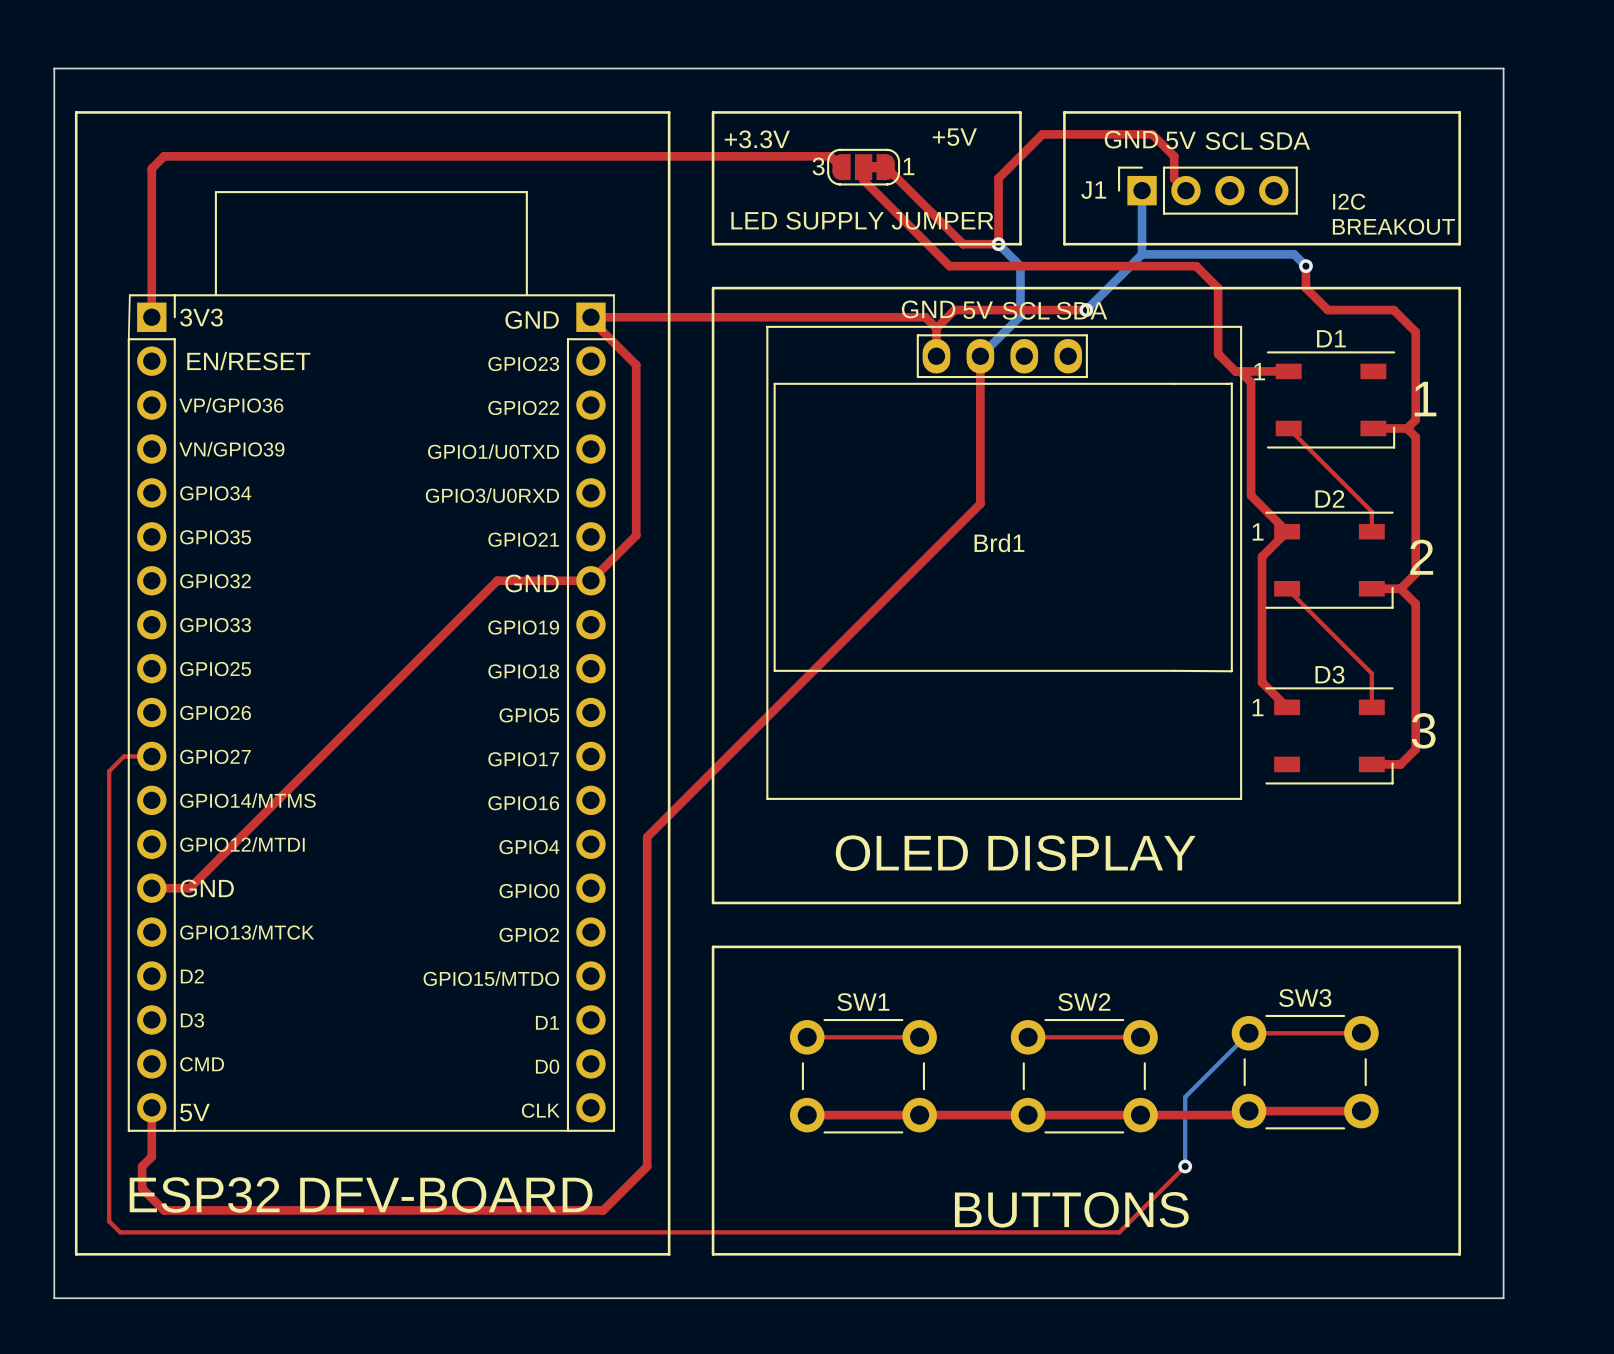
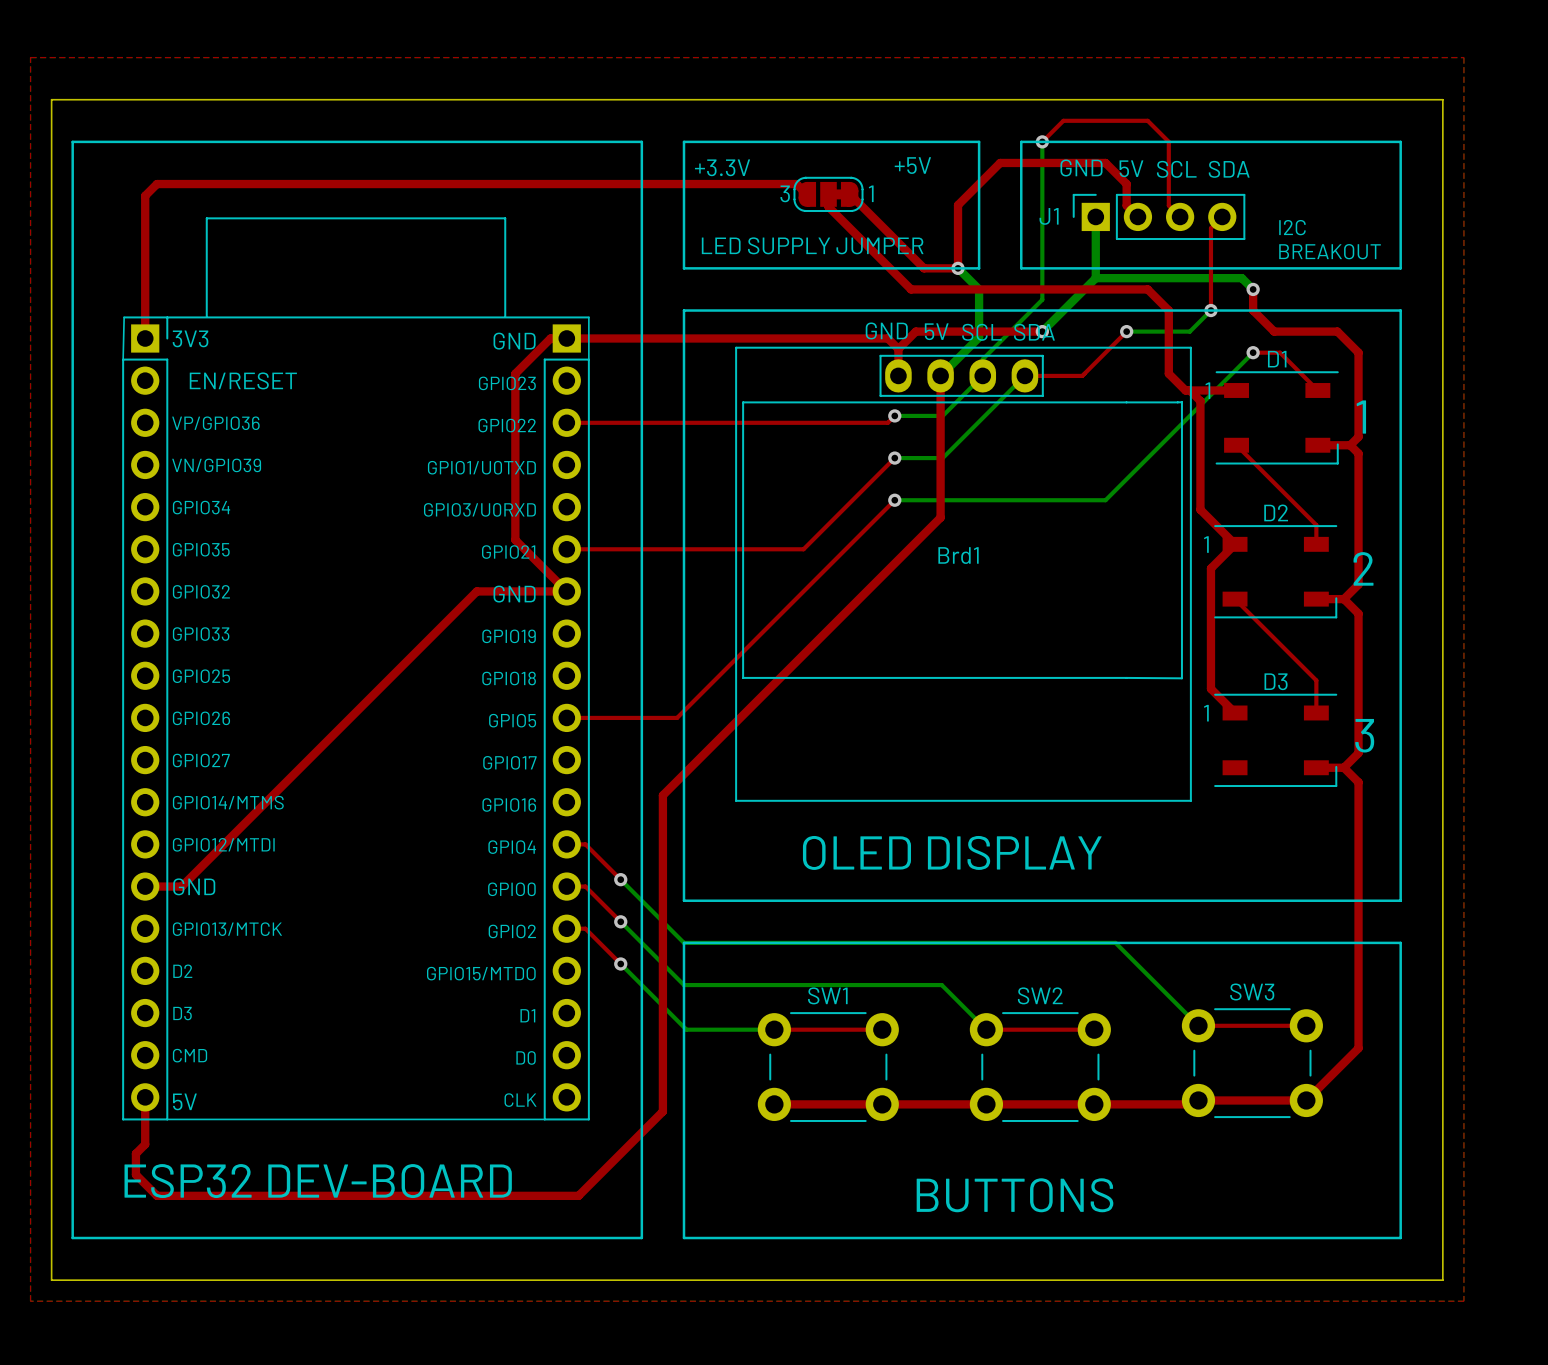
top zone outline: none -> (30, 57) (1463, 57) (1463, 1301) (30, 1301) (30, 57)
top track: none -> (1042, 141) (1063, 120) (1147, 120) (1168, 141) (1168, 205) (1180, 216)
bottom track: none -> (1042, 141) (1042, 299) (982, 359) (982, 375) (942, 415) (894, 415)
via: none -> (1042, 141)
top track: none -> (1222, 216) (1210, 228) (1210, 310)
bottom track: none -> (1210, 310) (1189, 331) (1126, 331)
via: none -> (1210, 310)
top track: none -> (1126, 331) (1082, 375) (1024, 375)
via: none -> (1126, 331)
top track: (590, 319) (636, 364) (636, 535) (590, 580) -> (566, 338) (550, 338) (515, 373) (515, 540) (566, 591)
top track: none -> (1253, 352) (1280, 352) (1317, 390)
bottom track: none -> (1253, 352) (1105, 500) (894, 500)
via: none -> (1253, 352)
bottom track: none -> (1024, 375) (942, 458) (894, 458)
top track: none -> (894, 415) (887, 422) (566, 422)
via: none -> (894, 415)
top track: none -> (894, 458) (803, 549) (566, 549)
via: none -> (894, 458)
top track: none -> (894, 500) (677, 717) (566, 717)
via: none -> (894, 500)
top track: (151, 756) (123, 756) (109, 771) (109, 1221) (120, 1232) (1119, 1232) (1185, 1166) -> none
top track: none -> (1343, 767) (1358, 782) (1358, 1048) (1306, 1100)
top track: (691, 793) (647, 837) (647, 1166) -> (662, 795) (662, 1111) (620, 1153)
top track: none -> (566, 844) (585, 844) (620, 879)
via: none -> (620, 879)
top track: none -> (566, 886) (585, 886) (620, 921)
bottom track: none -> (620, 921) (683, 985) (941, 985) (986, 1029)
via: none -> (620, 921)
top track: none -> (566, 928) (585, 928) (620, 963)
bottom track: none -> (620, 963) (686, 1029) (774, 1029)
via: none -> (620, 963)
bottom track: (1249, 1033) (1185, 1097) (1185, 1166) -> (1198, 1025) (1115, 942) (683, 942) (620, 879)
via: (1185, 1166) -> none

